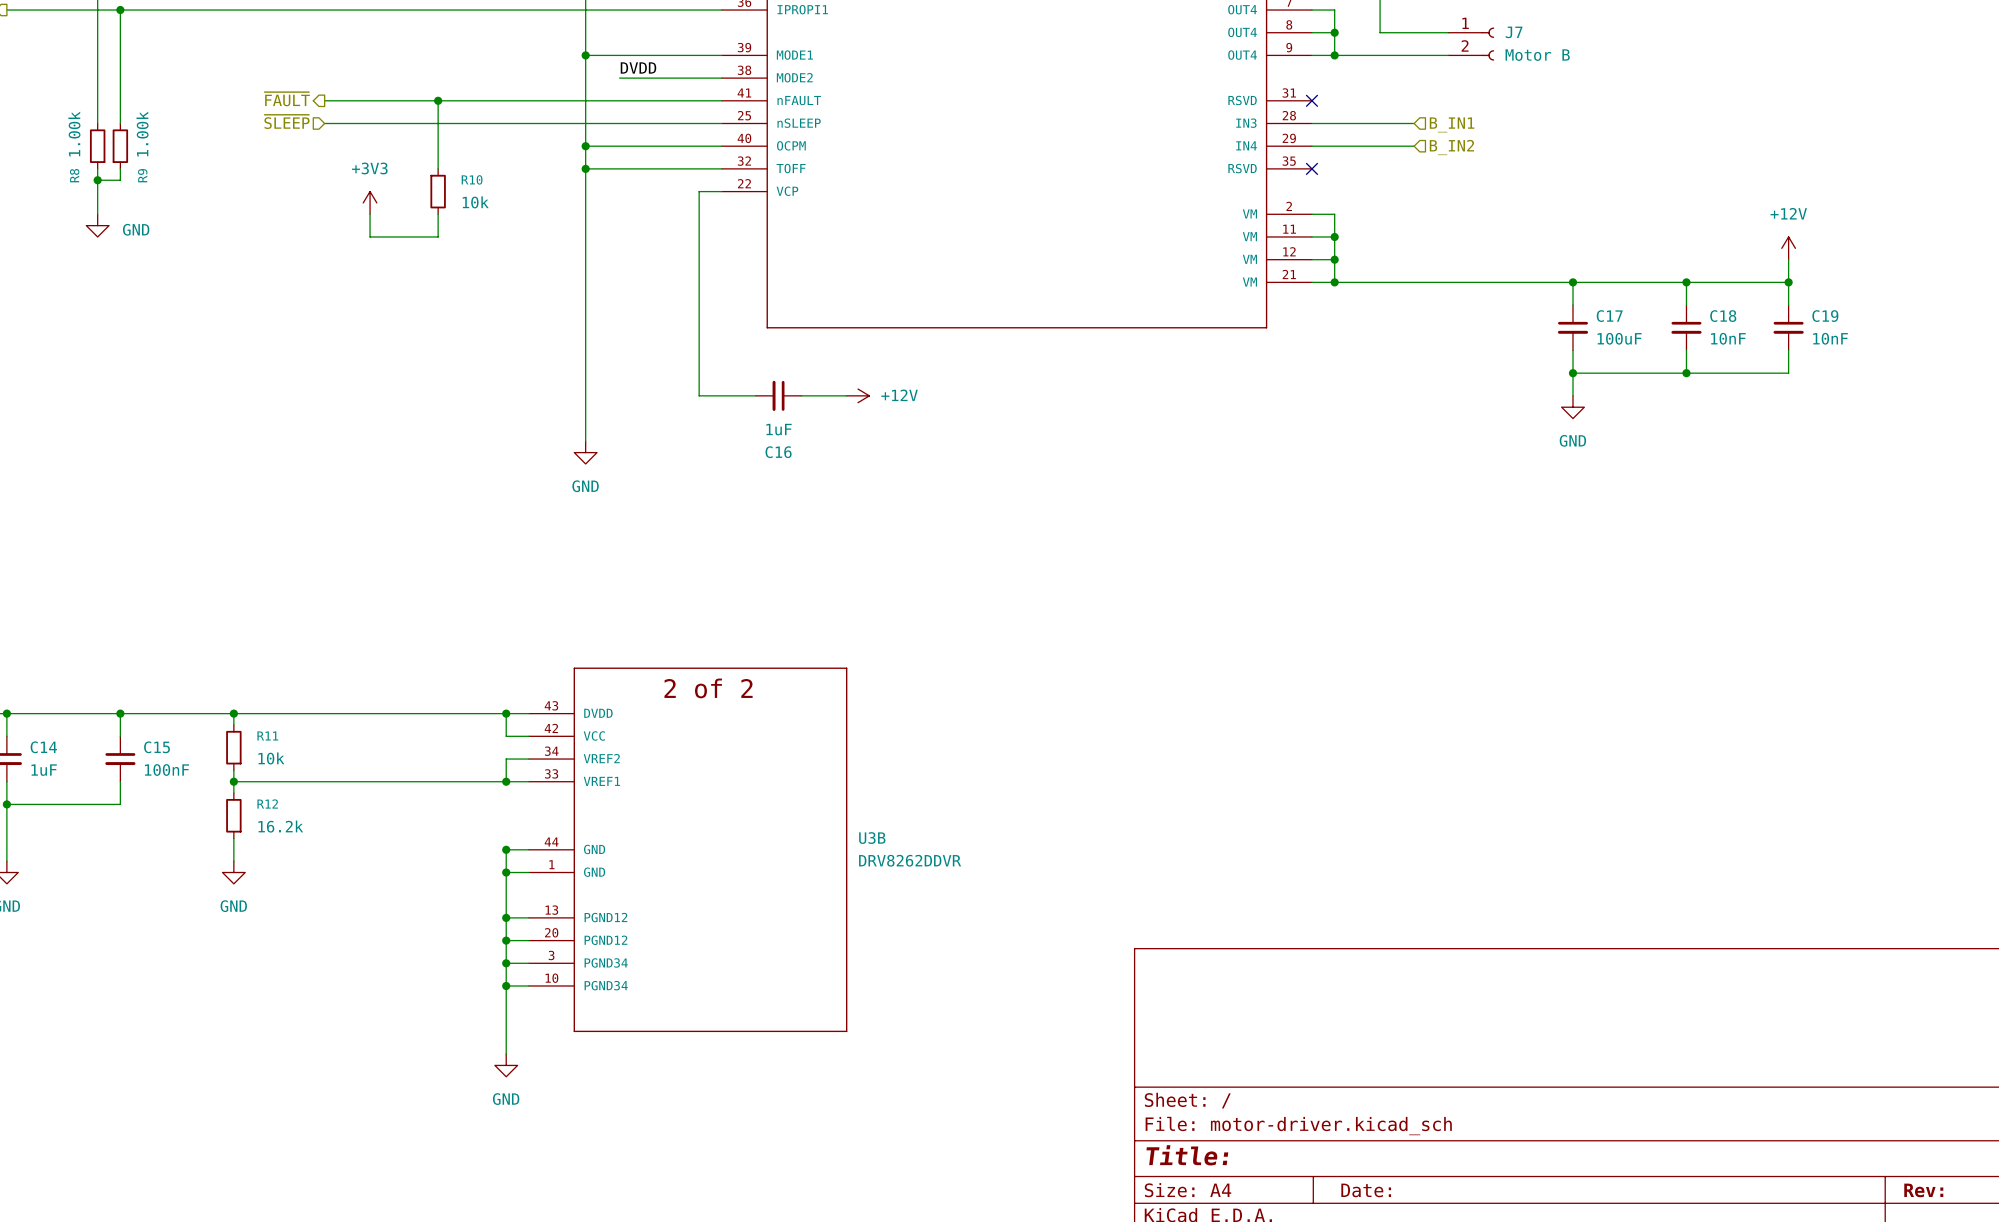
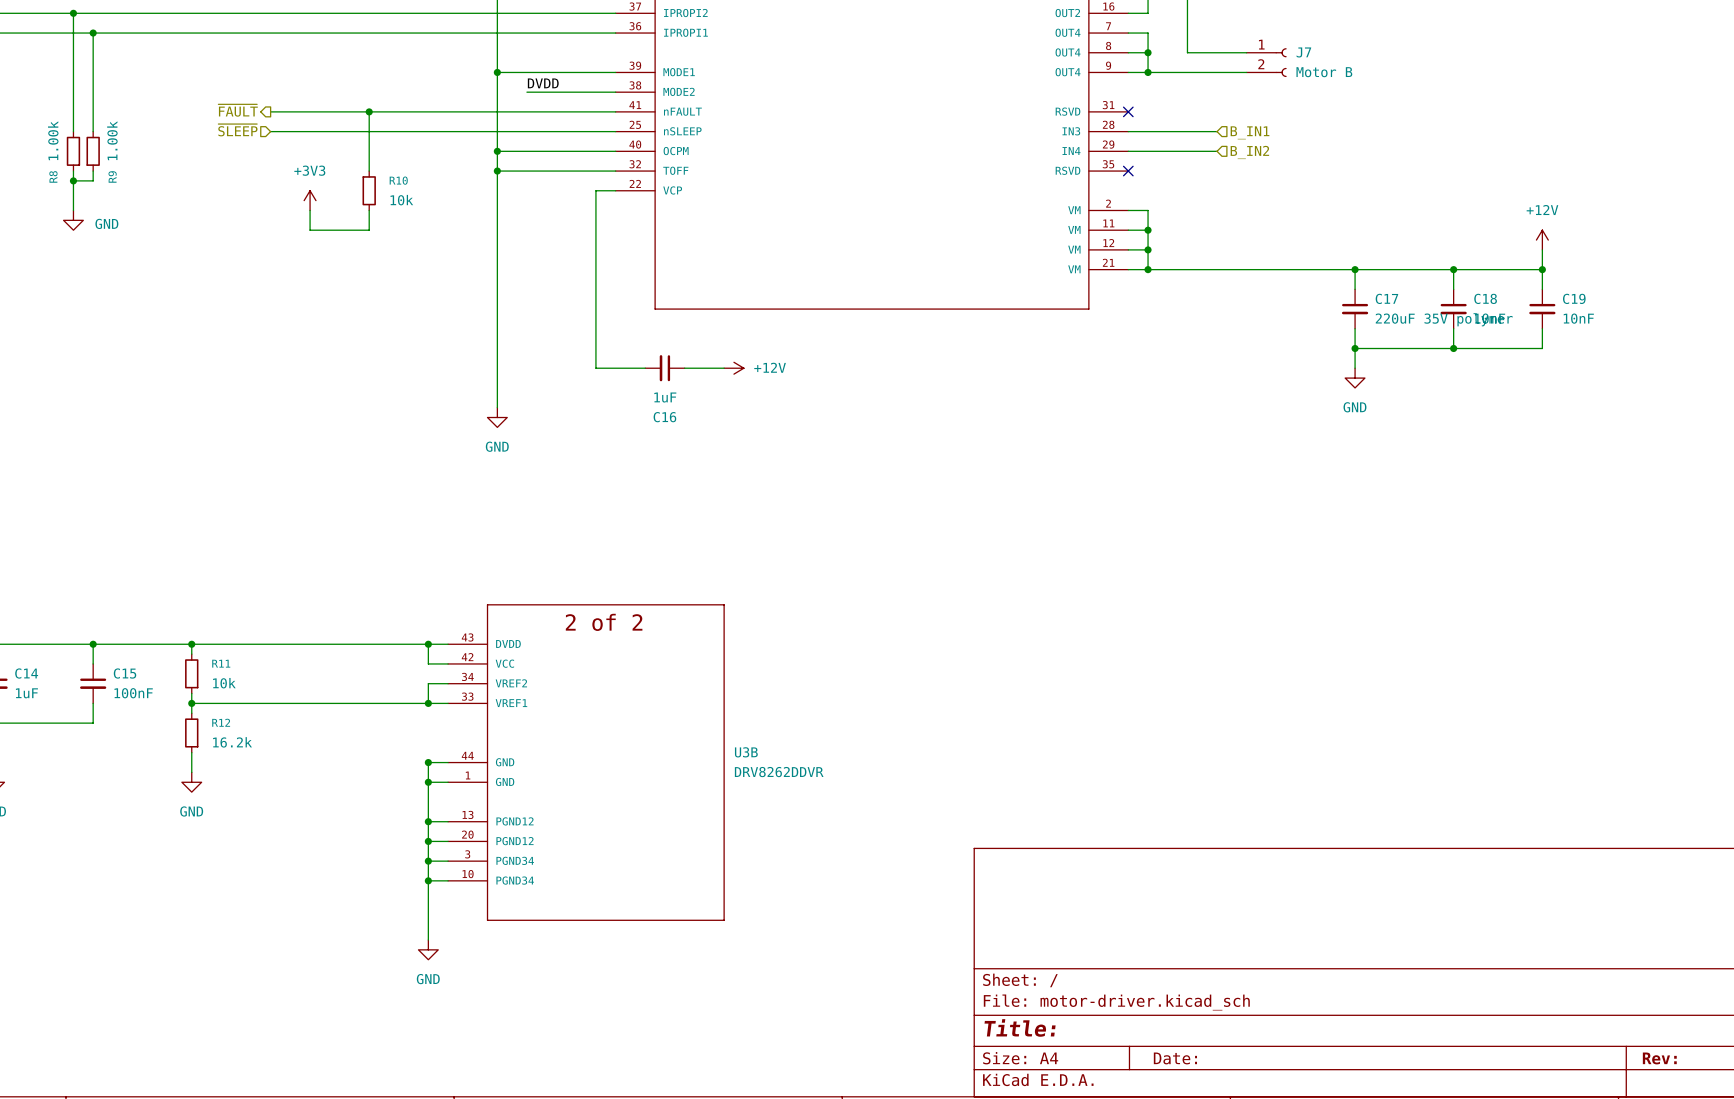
C17 value: 100uF (1619, 338) -> 220uF 35V polymer (1444, 319)

